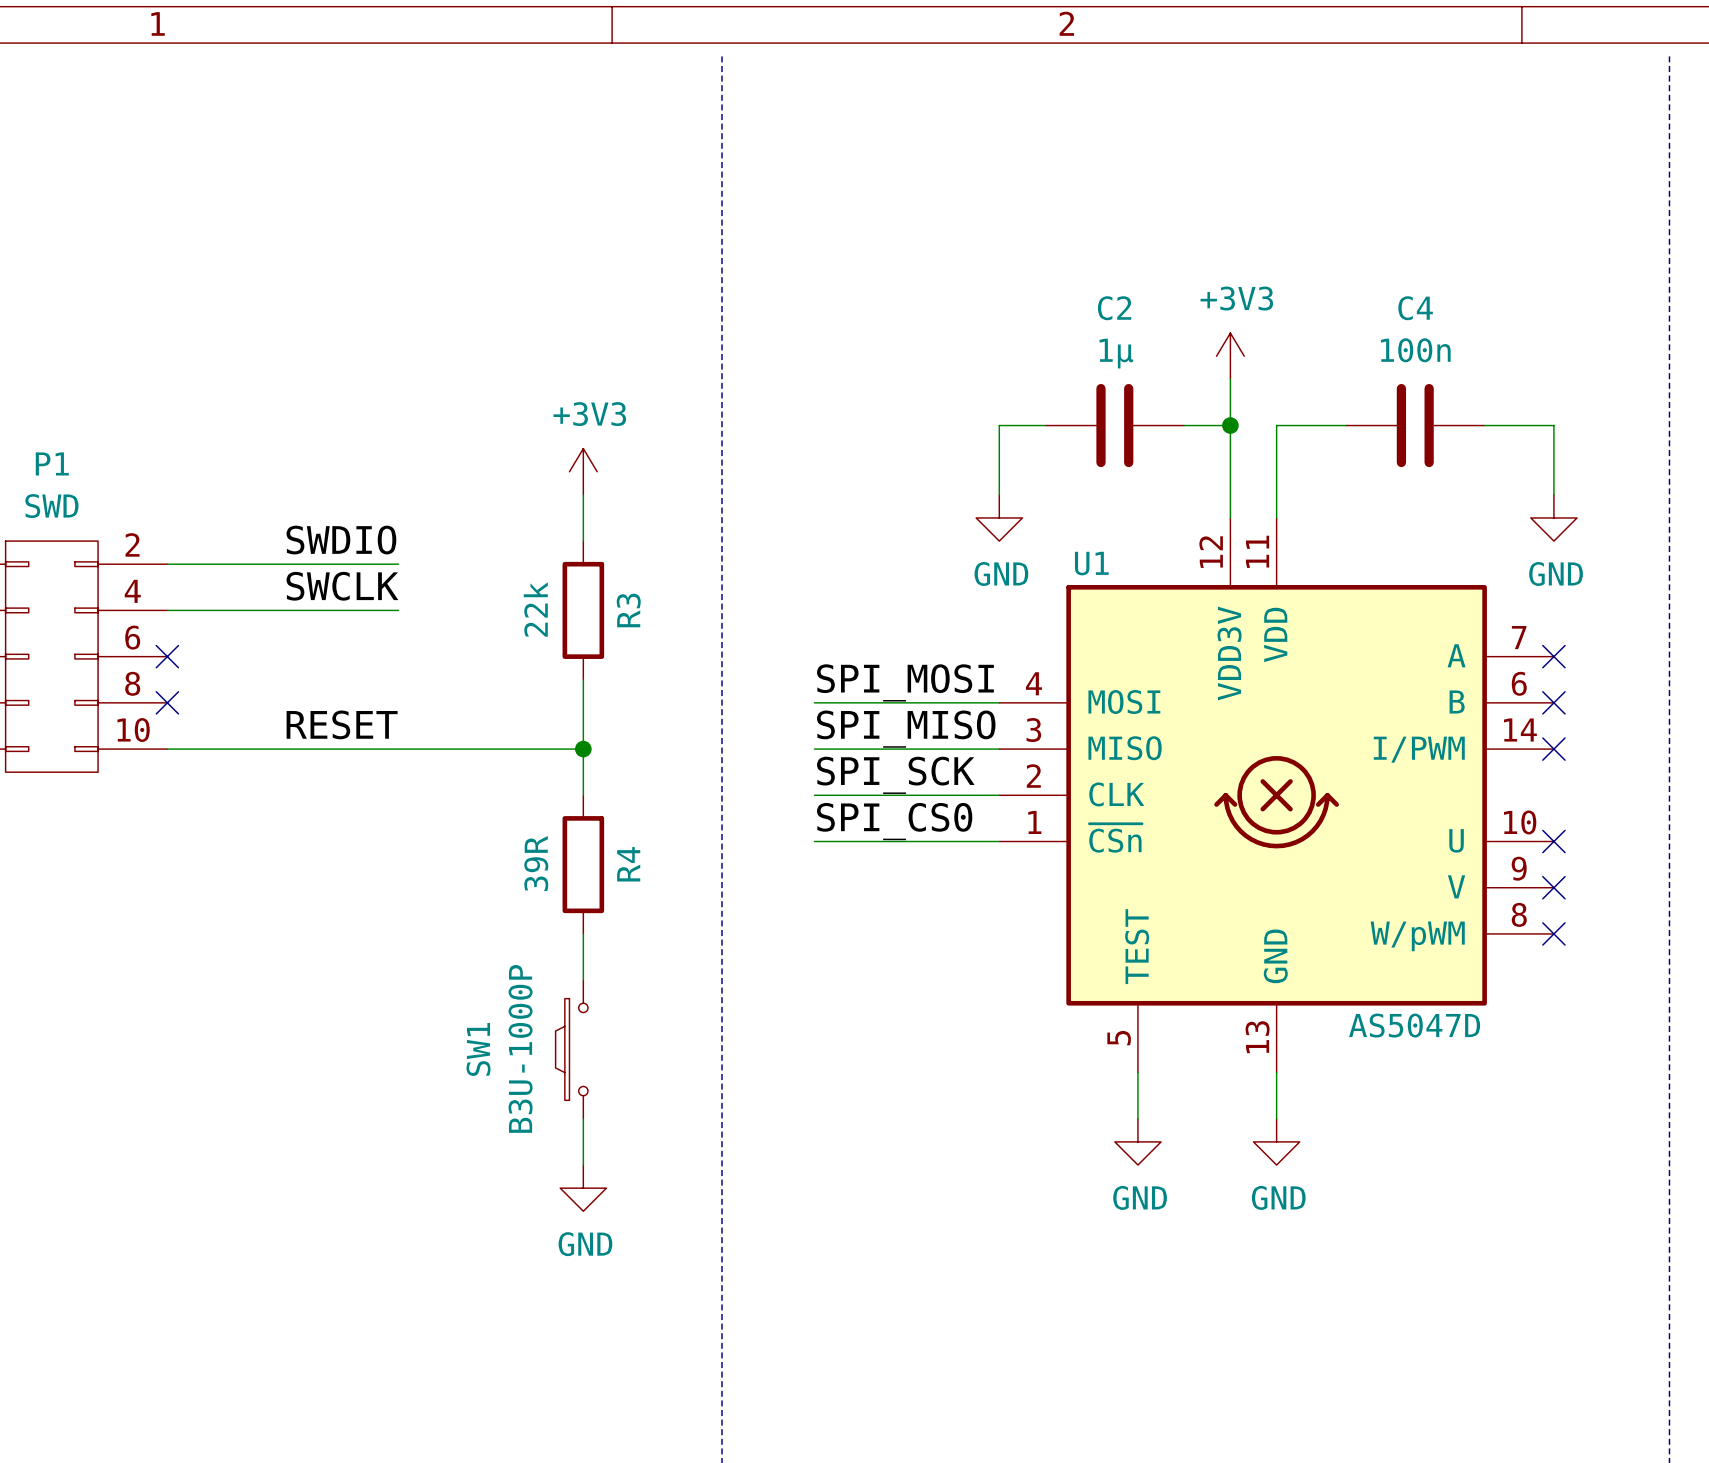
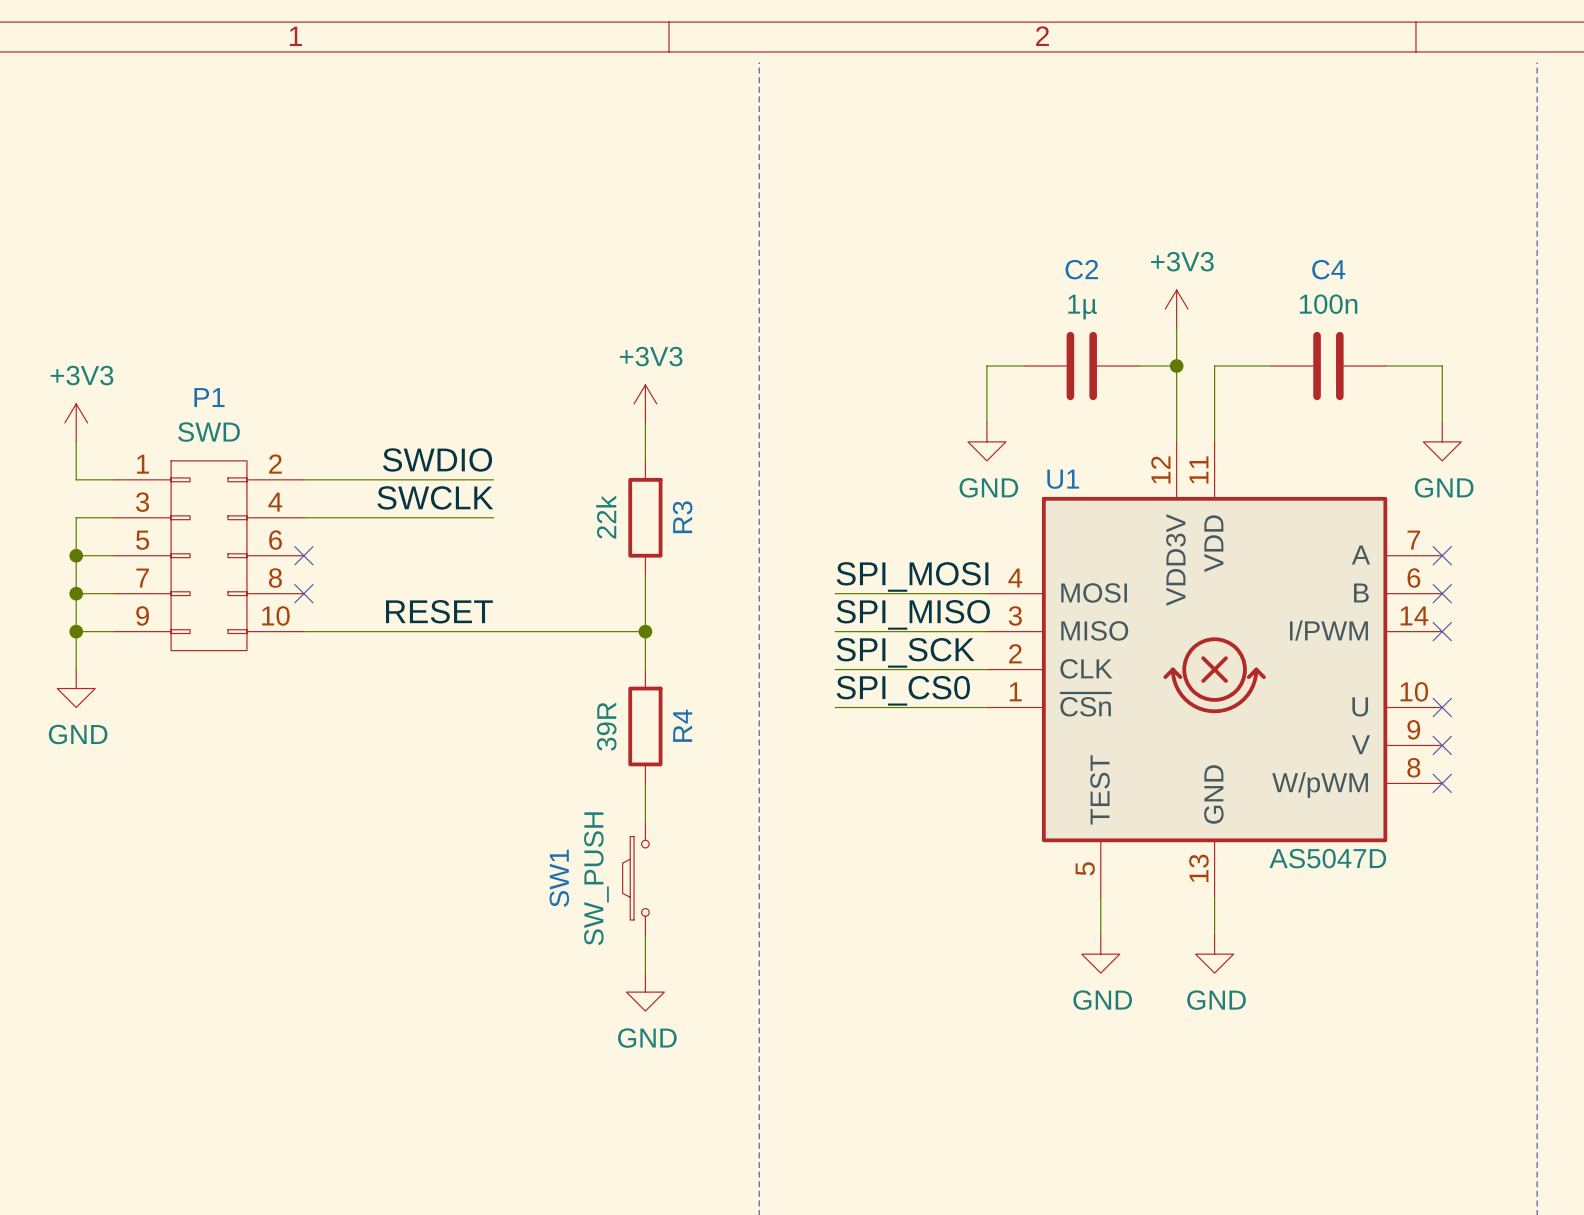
SW1 value: B3U-1000P (520, 1048) -> SW_PUSH (596, 878)

